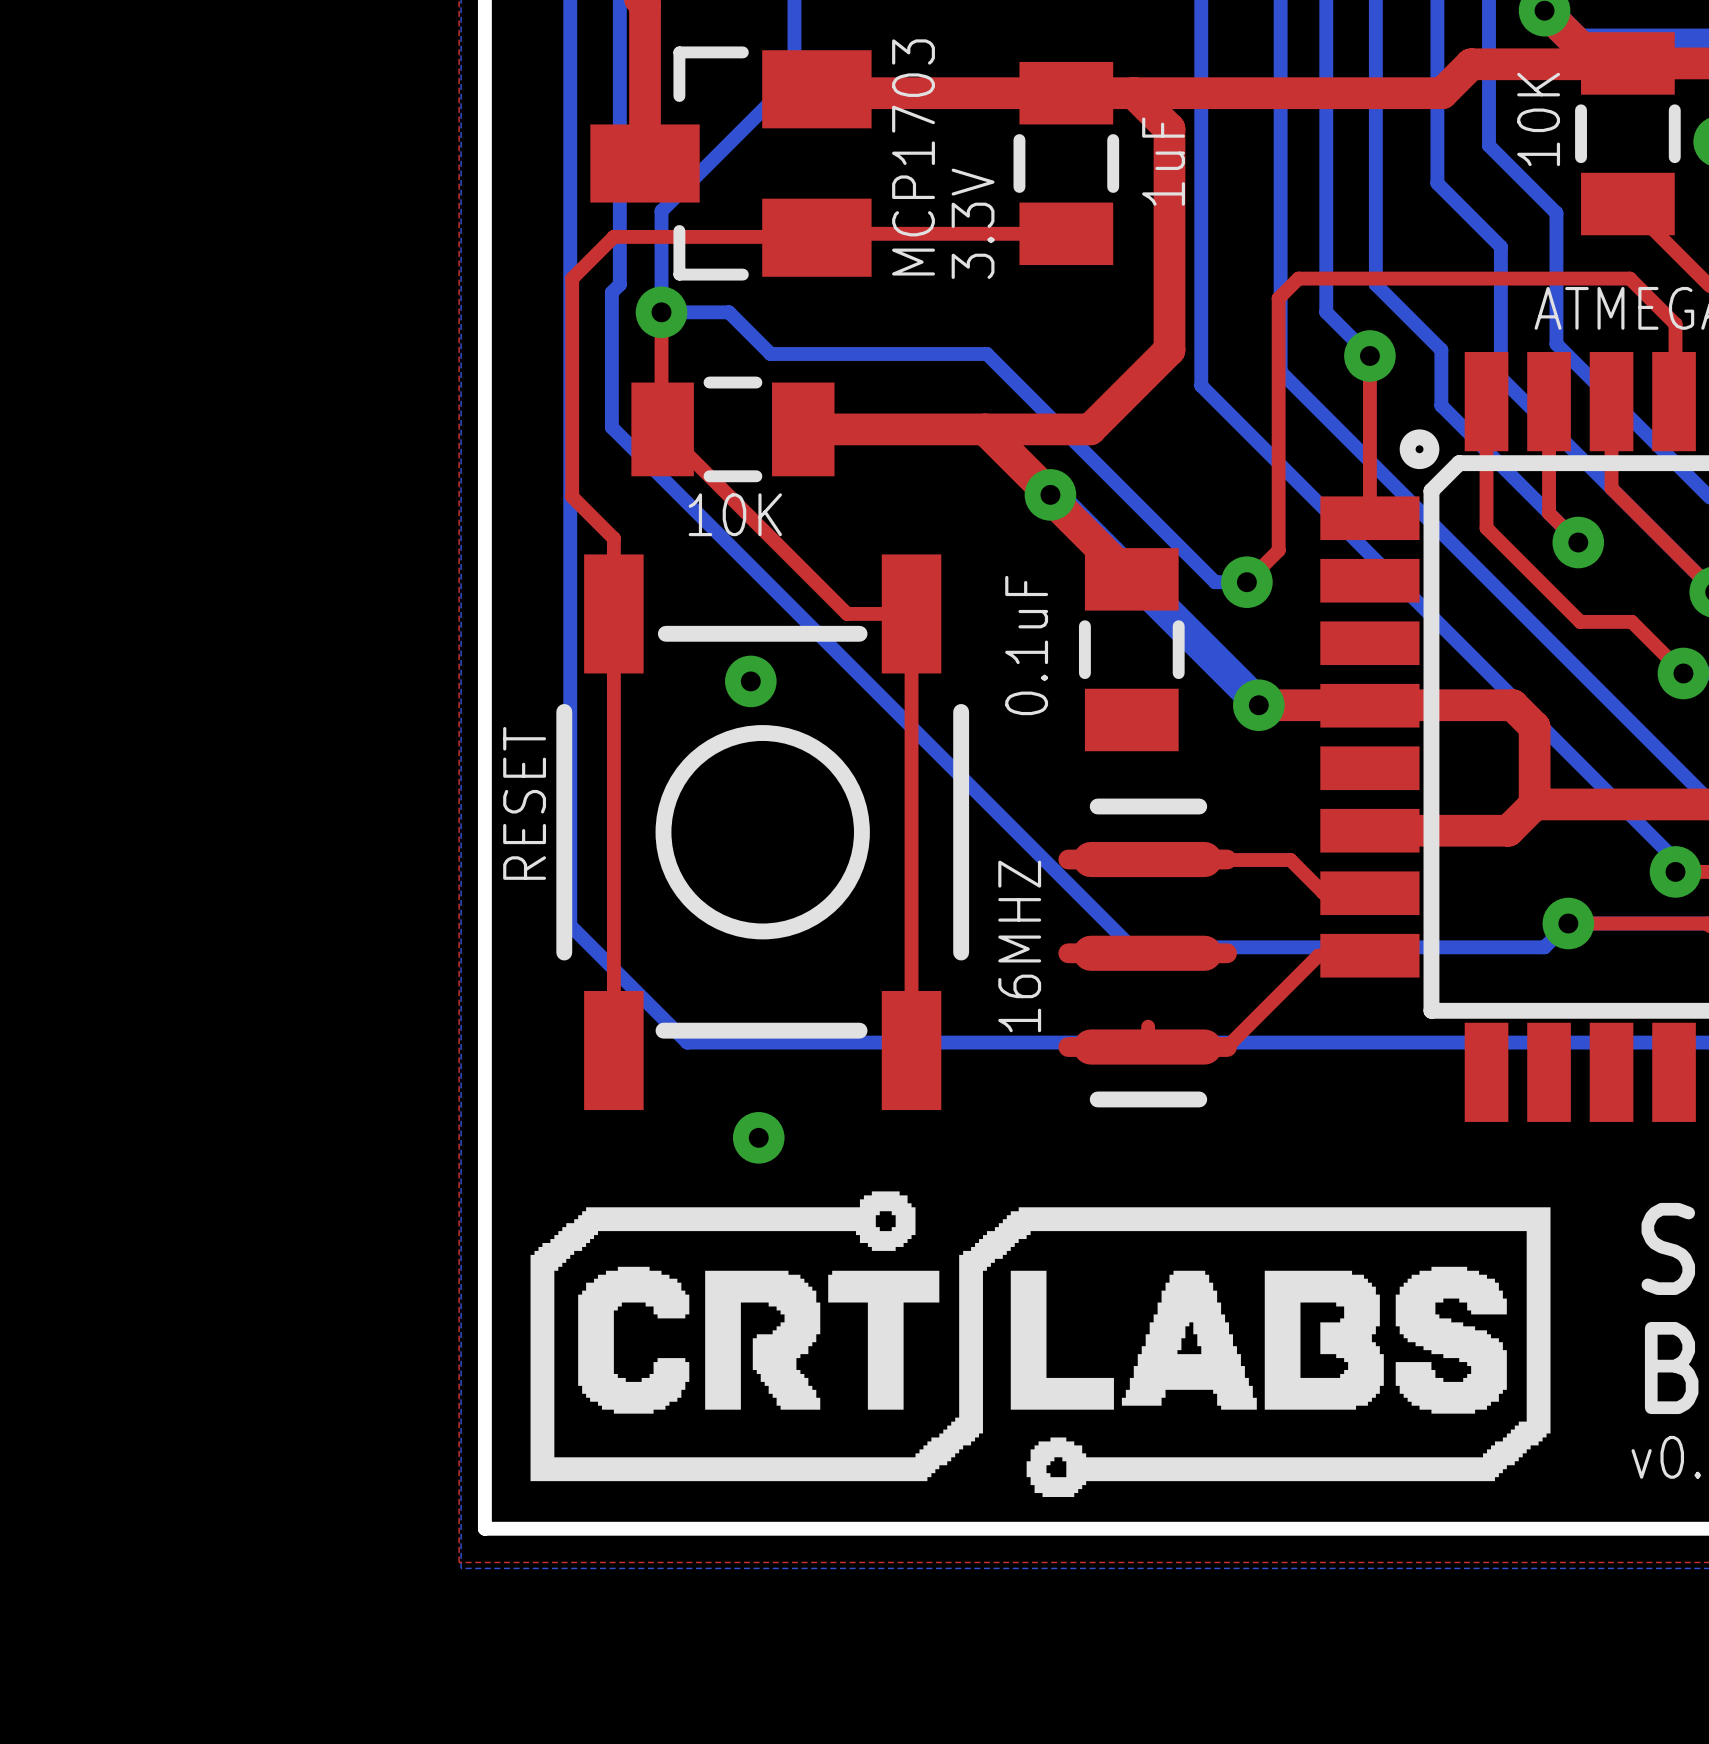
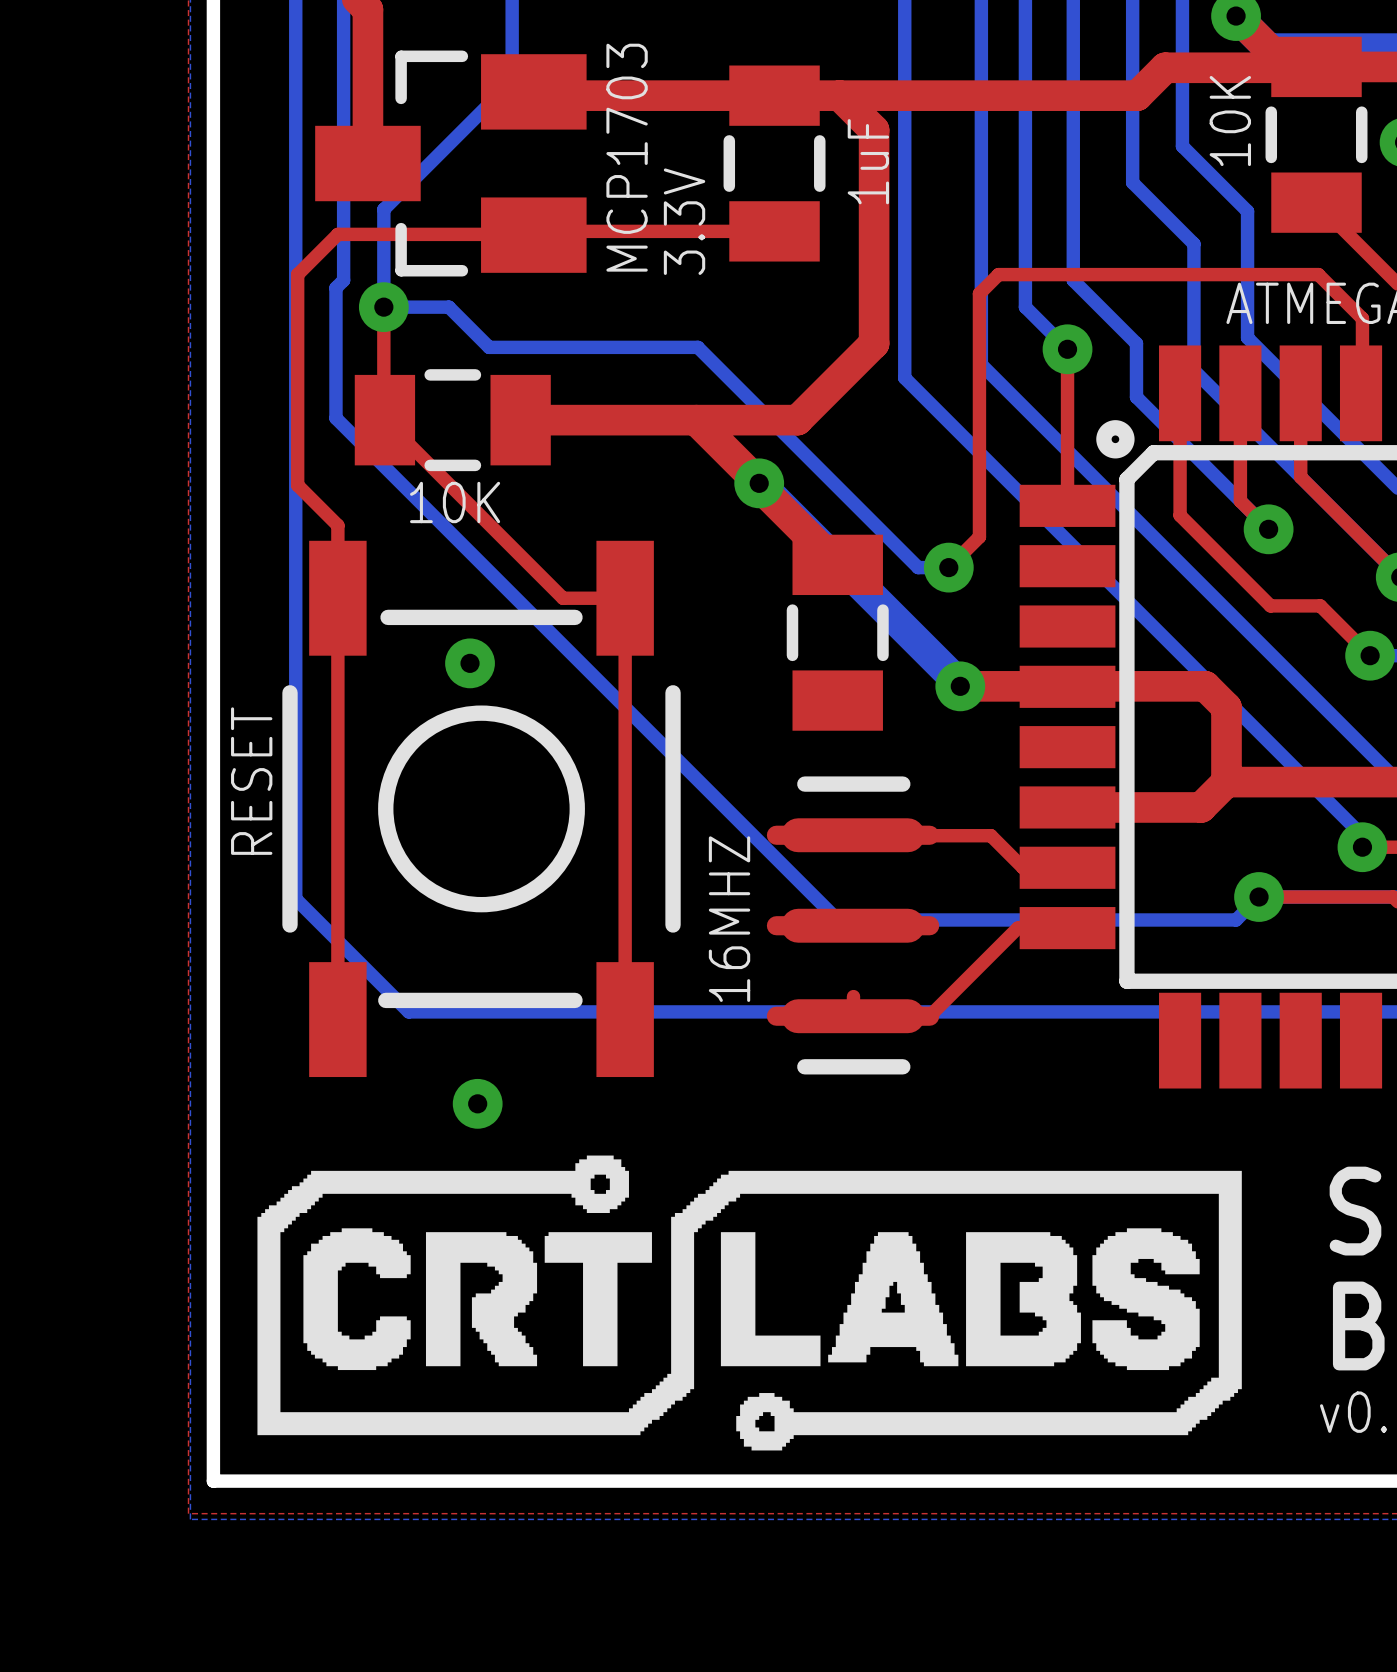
part value: 0.1uF (1026, 645) -> none

